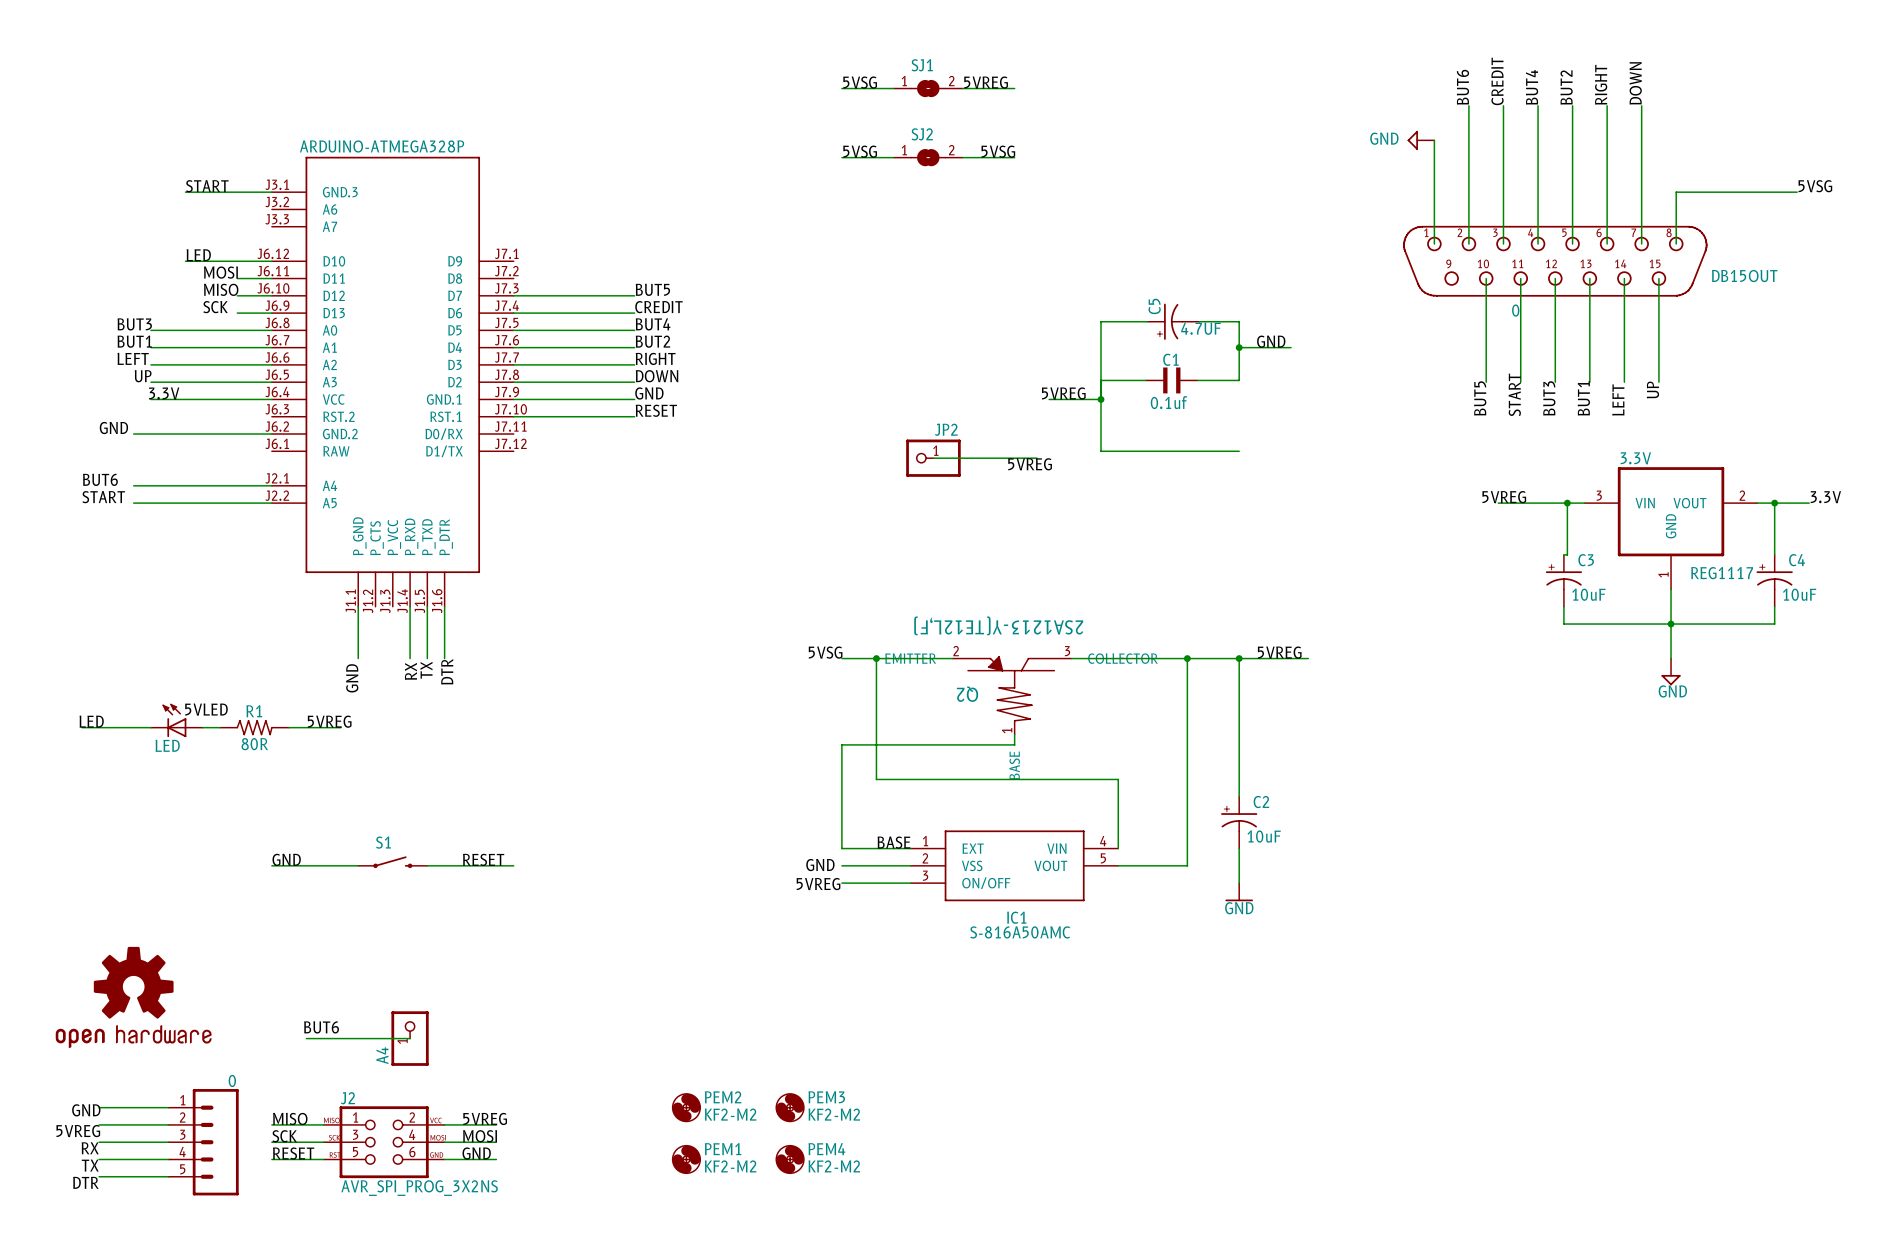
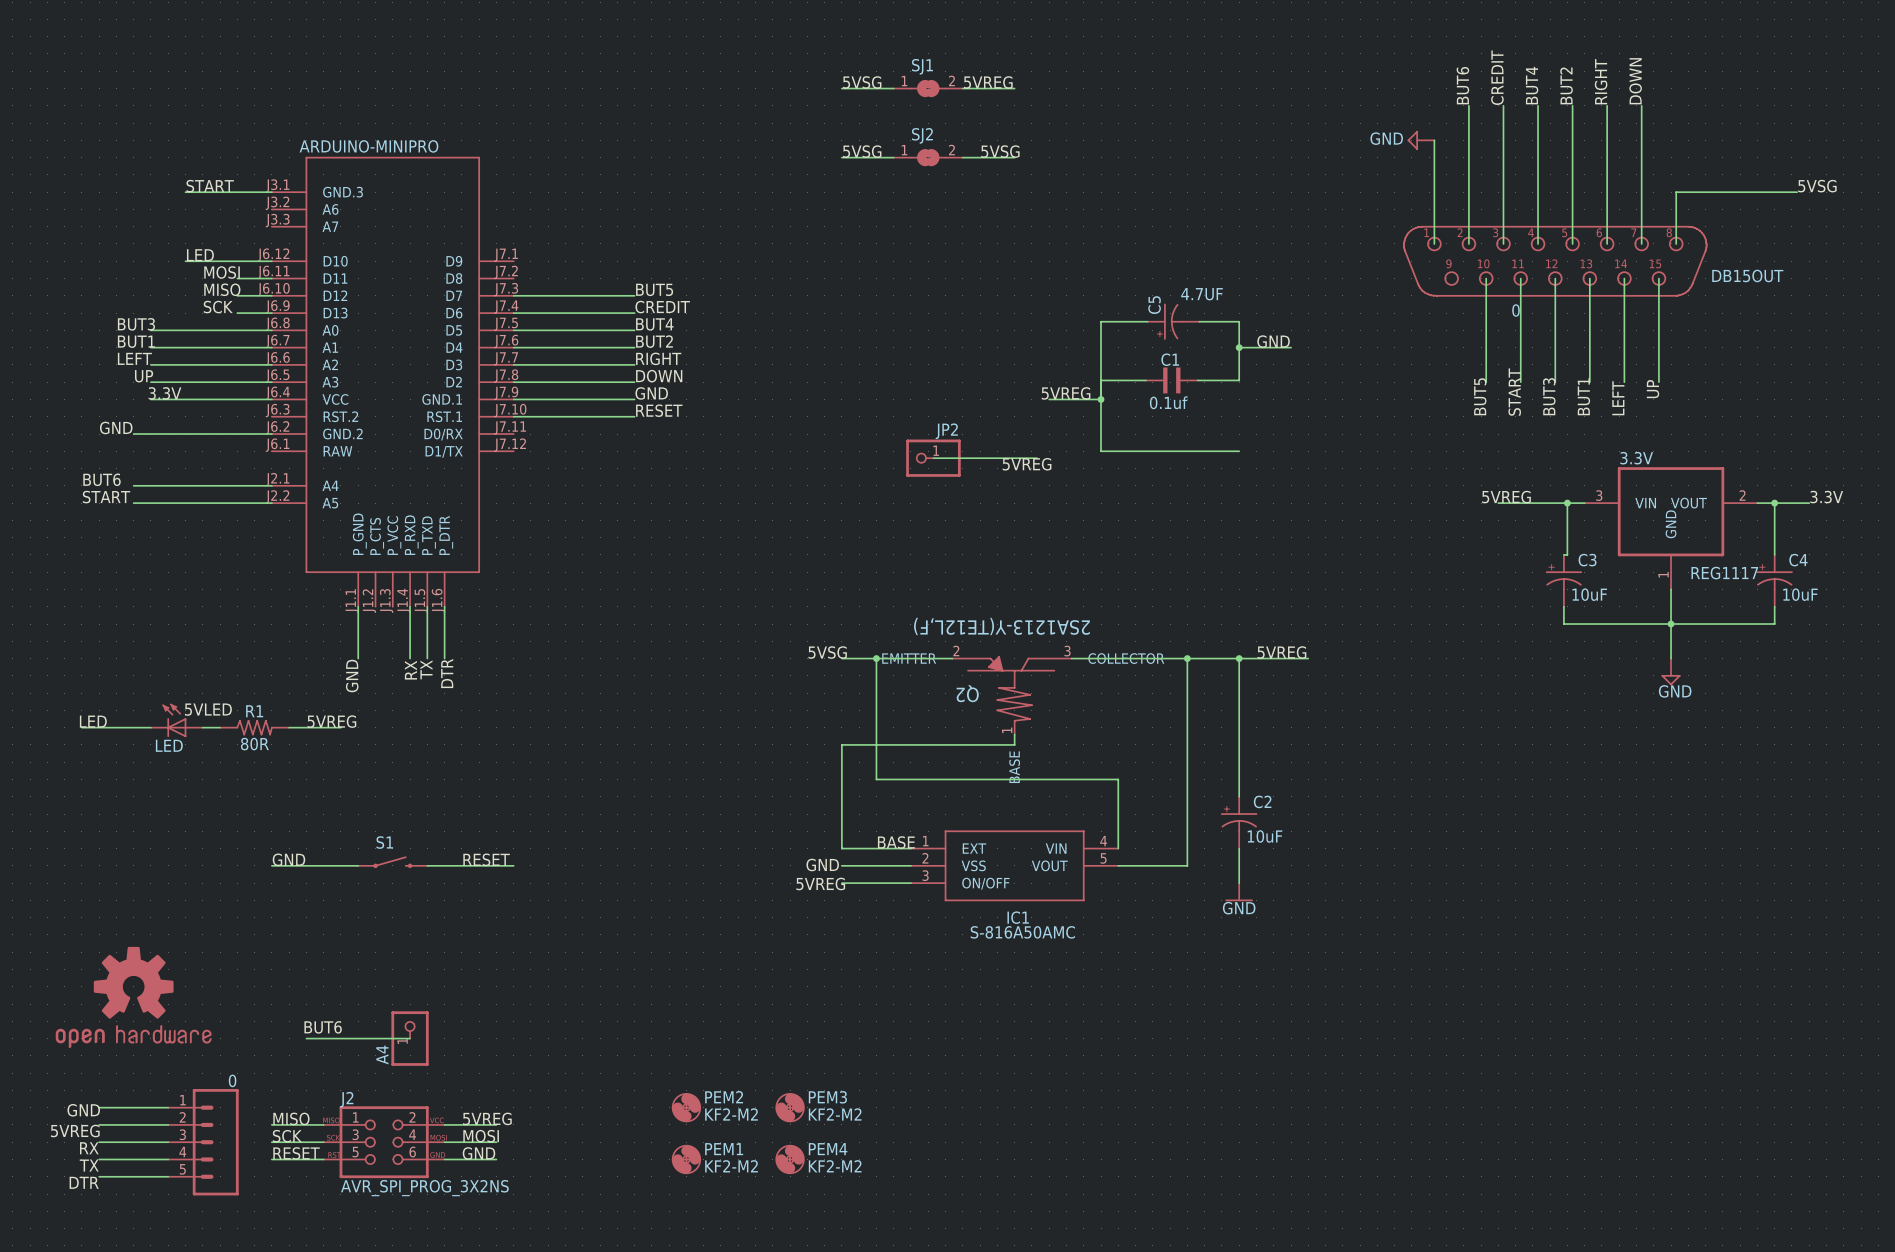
ARDUINO-ATMEGA328P name: ARDUINO-ATMEGA328P (382, 146) -> ARDUINO-MINIPRO (368, 146)
C5 value position: 4.7UF (1201, 328) -> 4.7UF (1202, 294)

